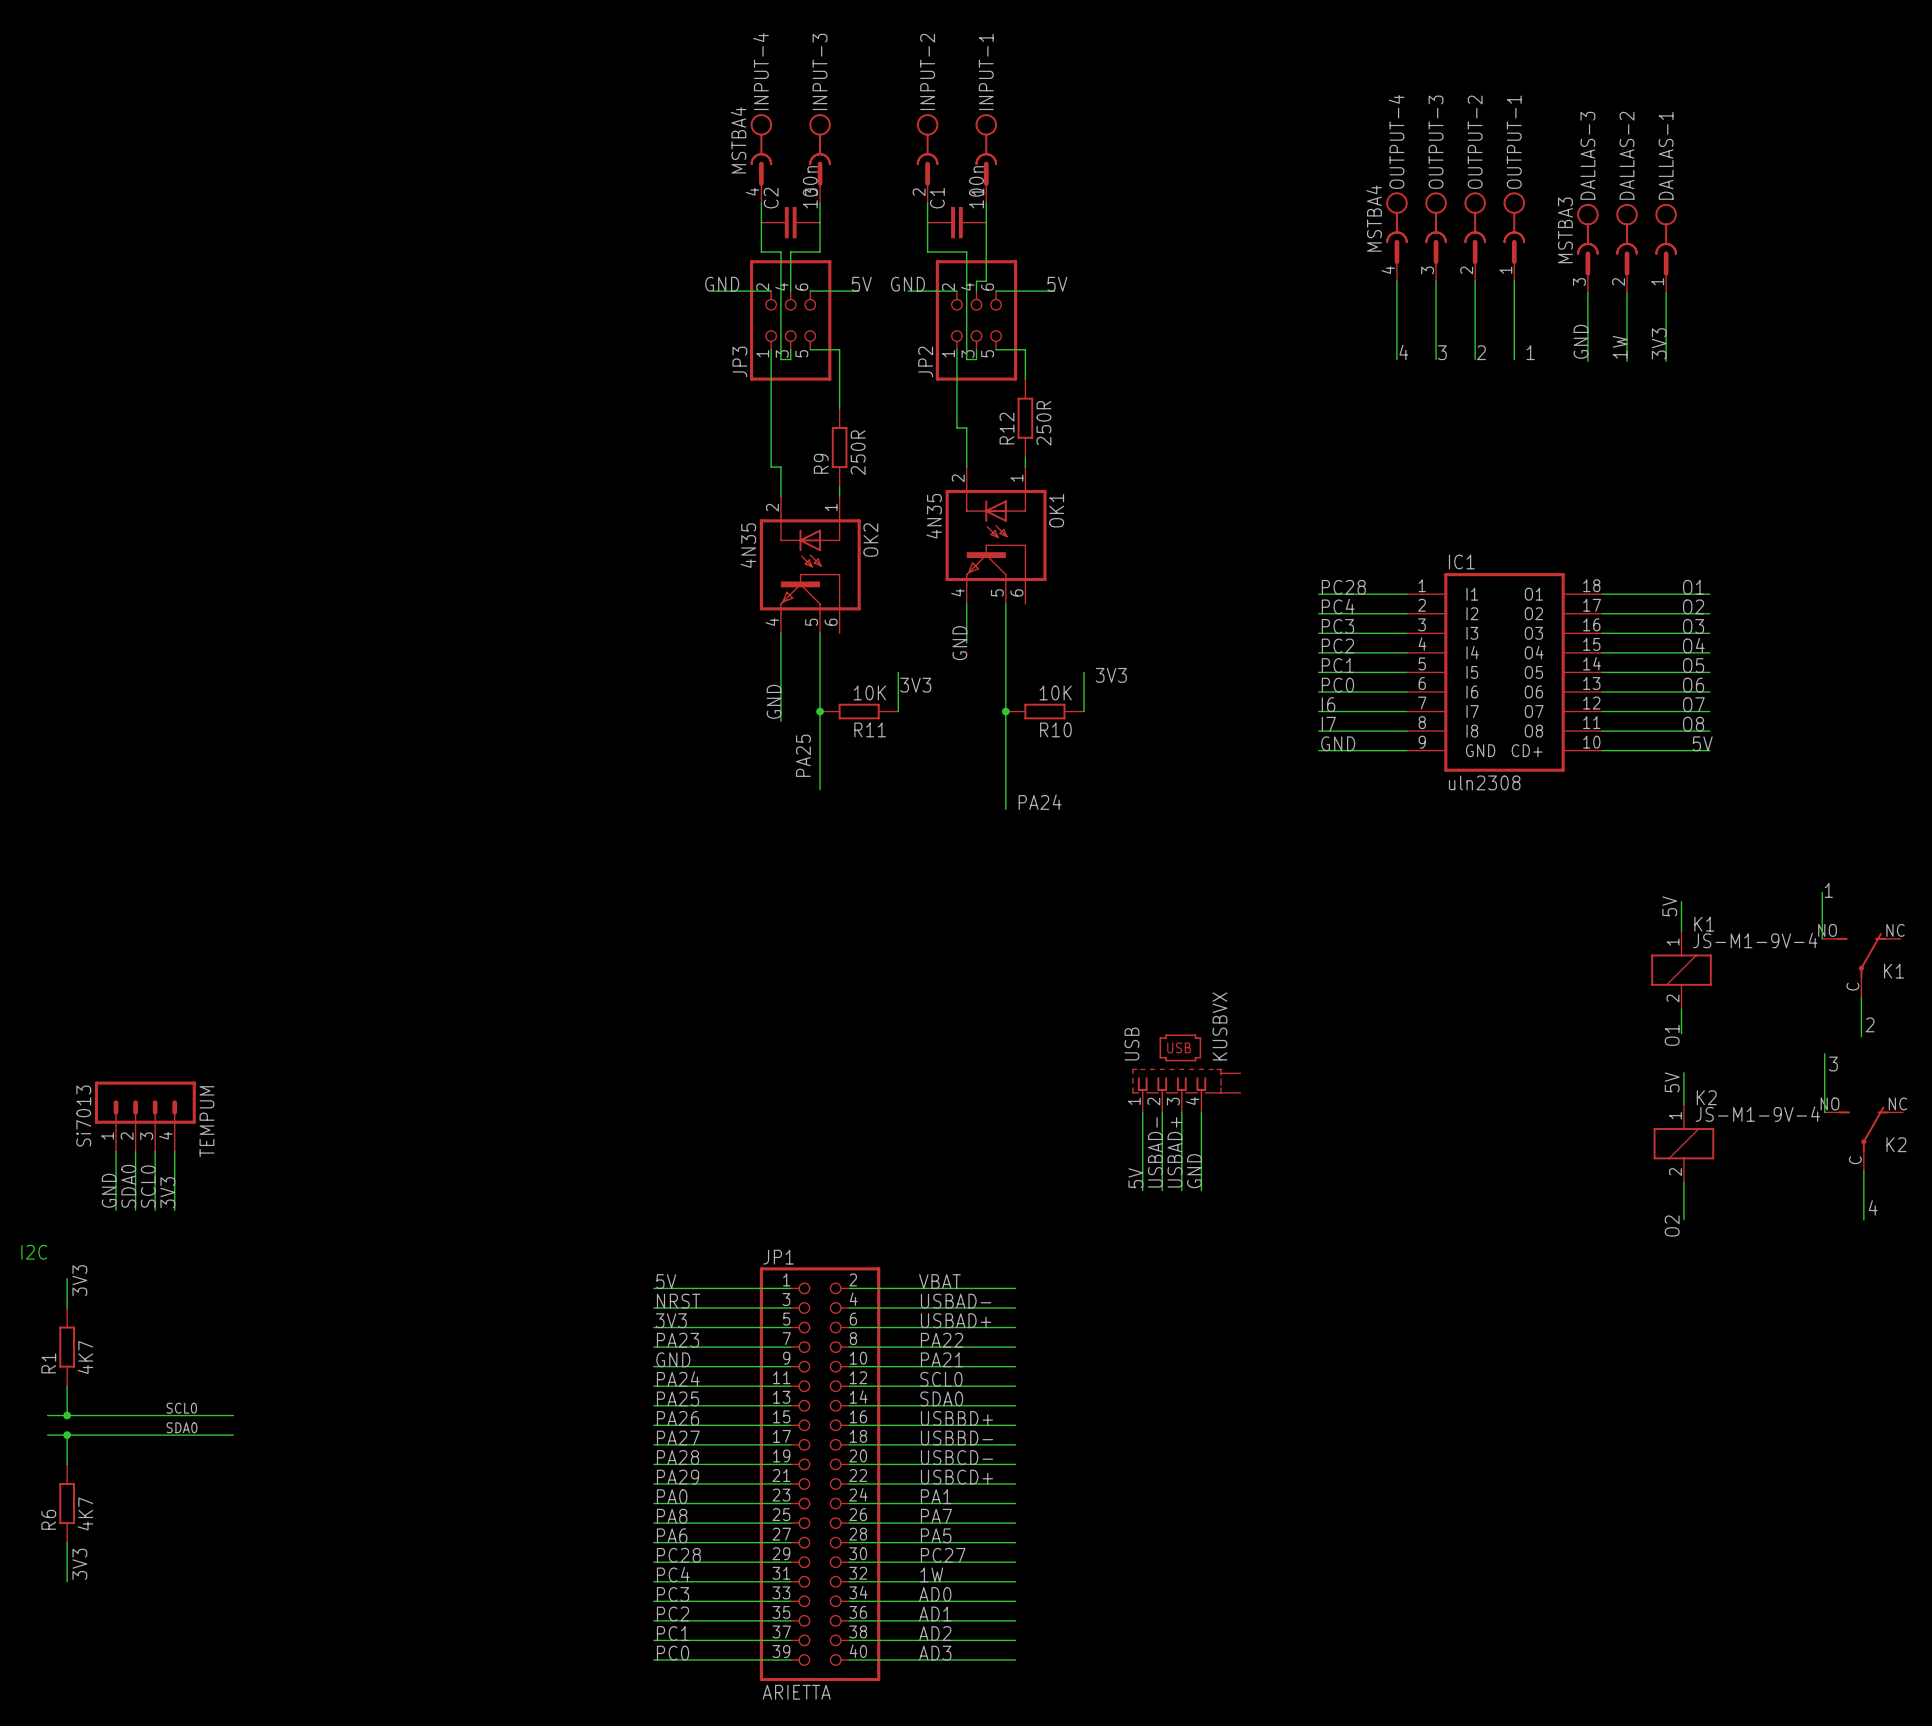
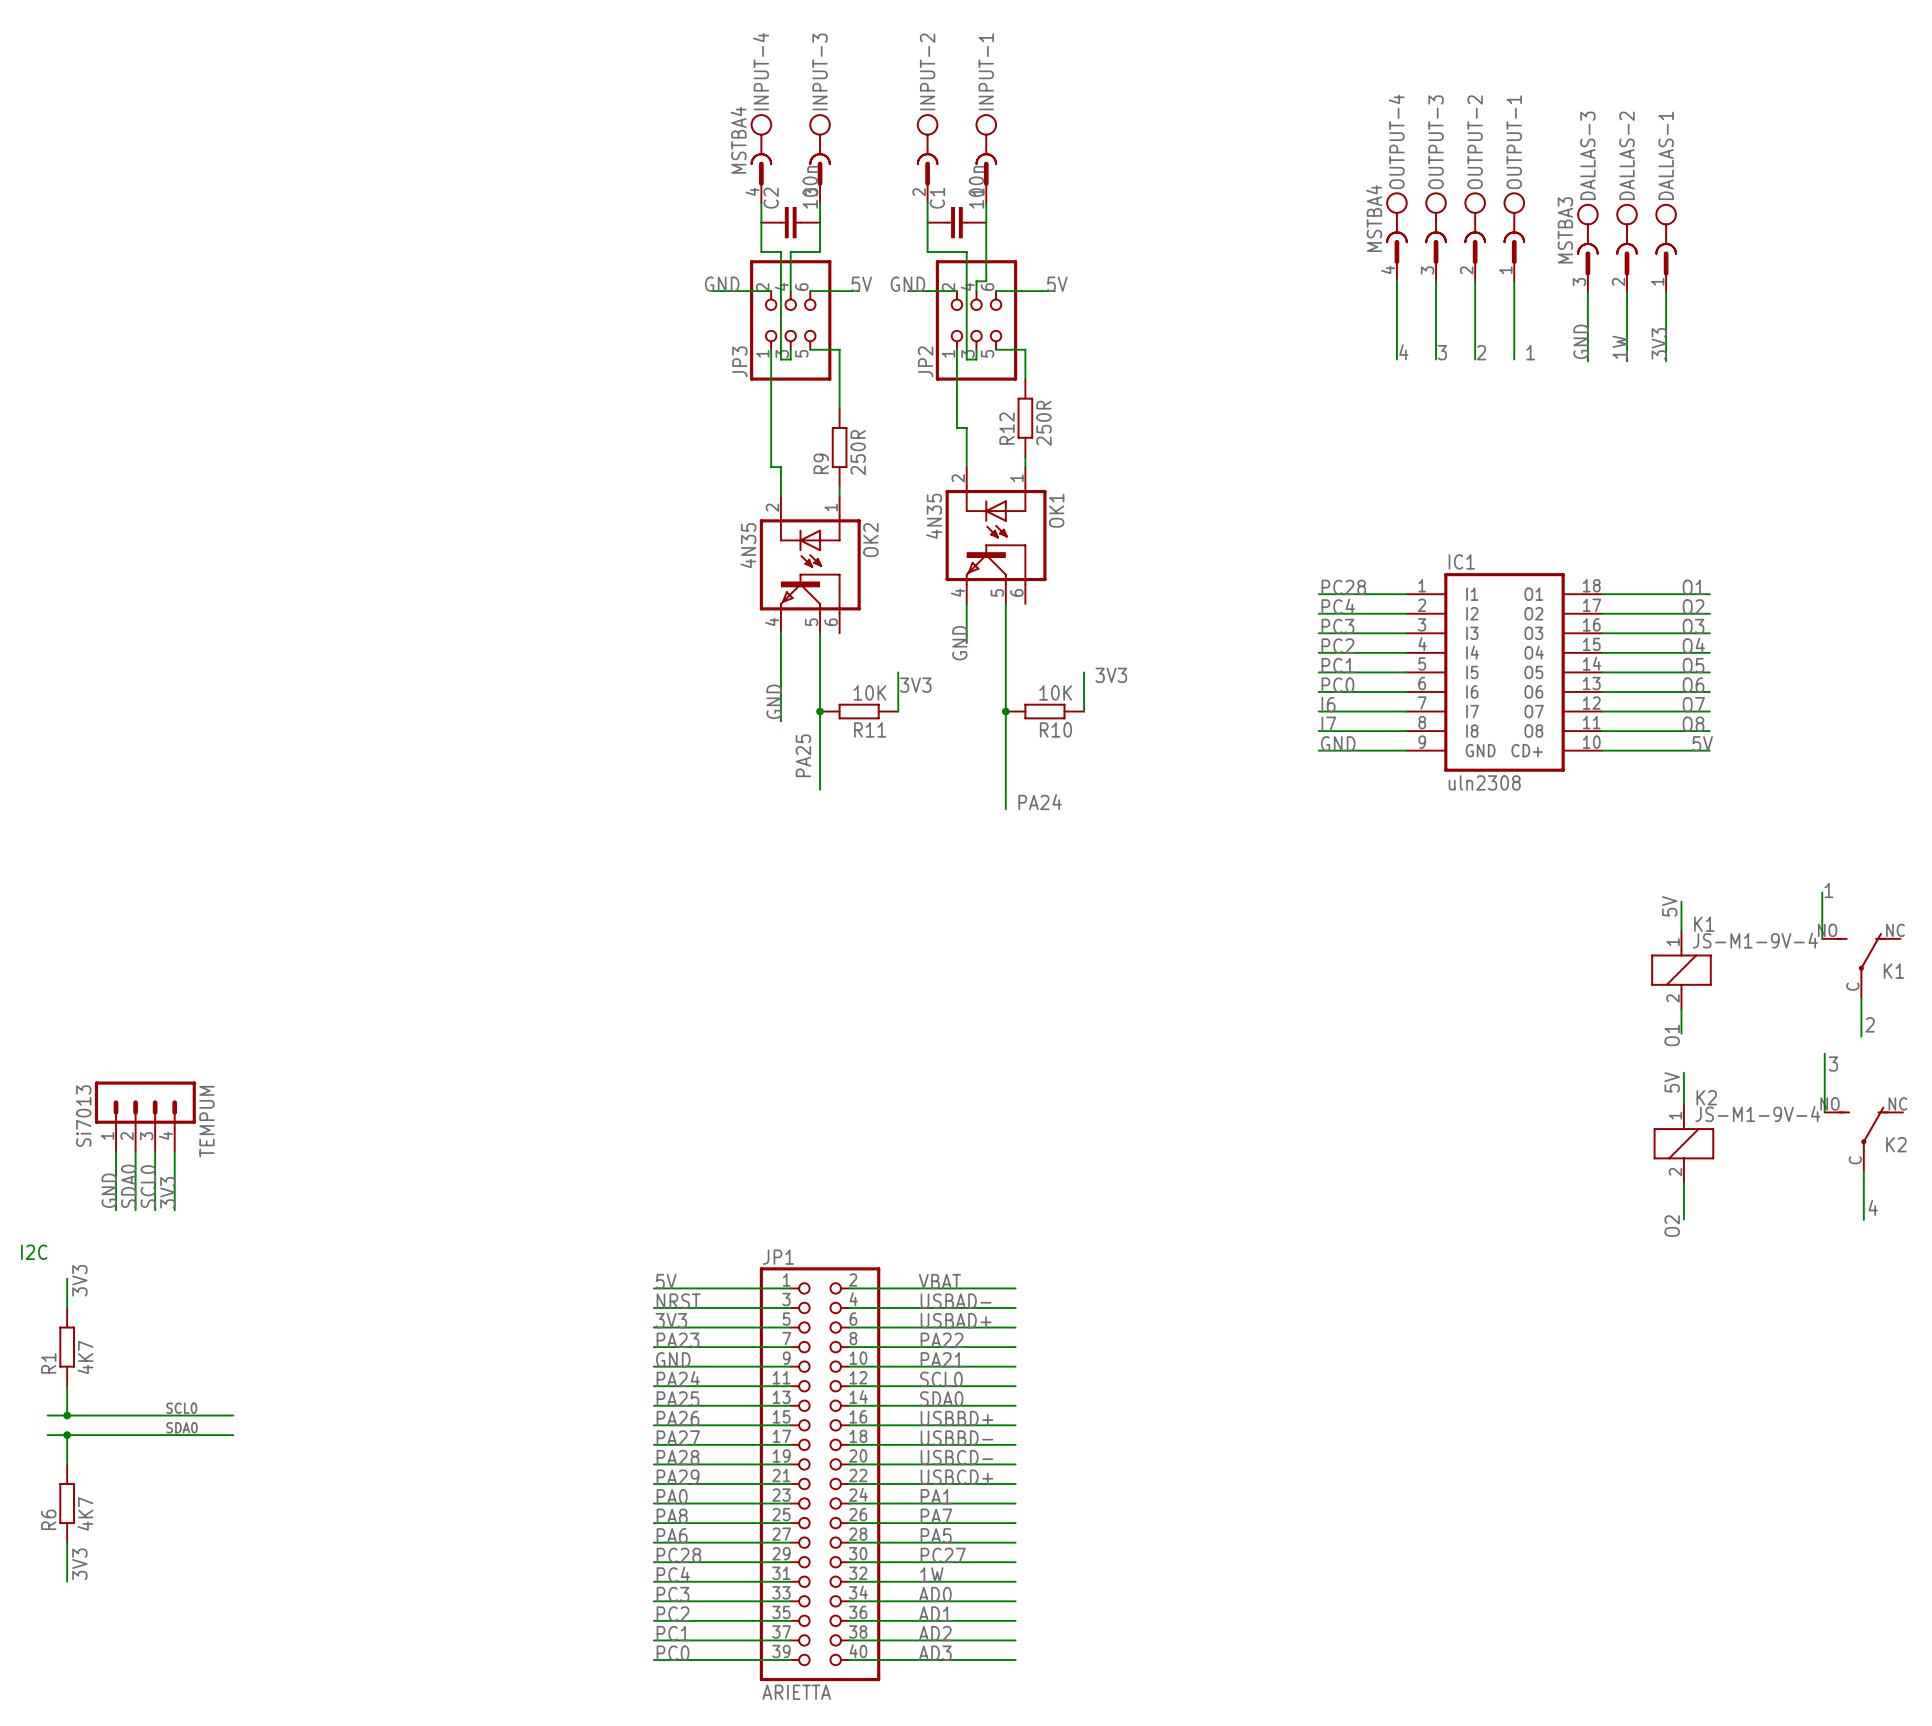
USB: KUSBVX (1186, 1073) -> none
wire: (1142, 1112) (1142, 1190) -> none
wire: (1162, 1112) (1162, 1190) -> none
wire: (1181, 1112) (1181, 1190) -> none
wire: (1201, 1112) (1201, 1190) -> none
label: USBAD- (1155, 1152) -> none
label: USBAD+ (1174, 1152) -> none
label: GND (1194, 1171) -> none
label: 5V (1135, 1178) -> none

